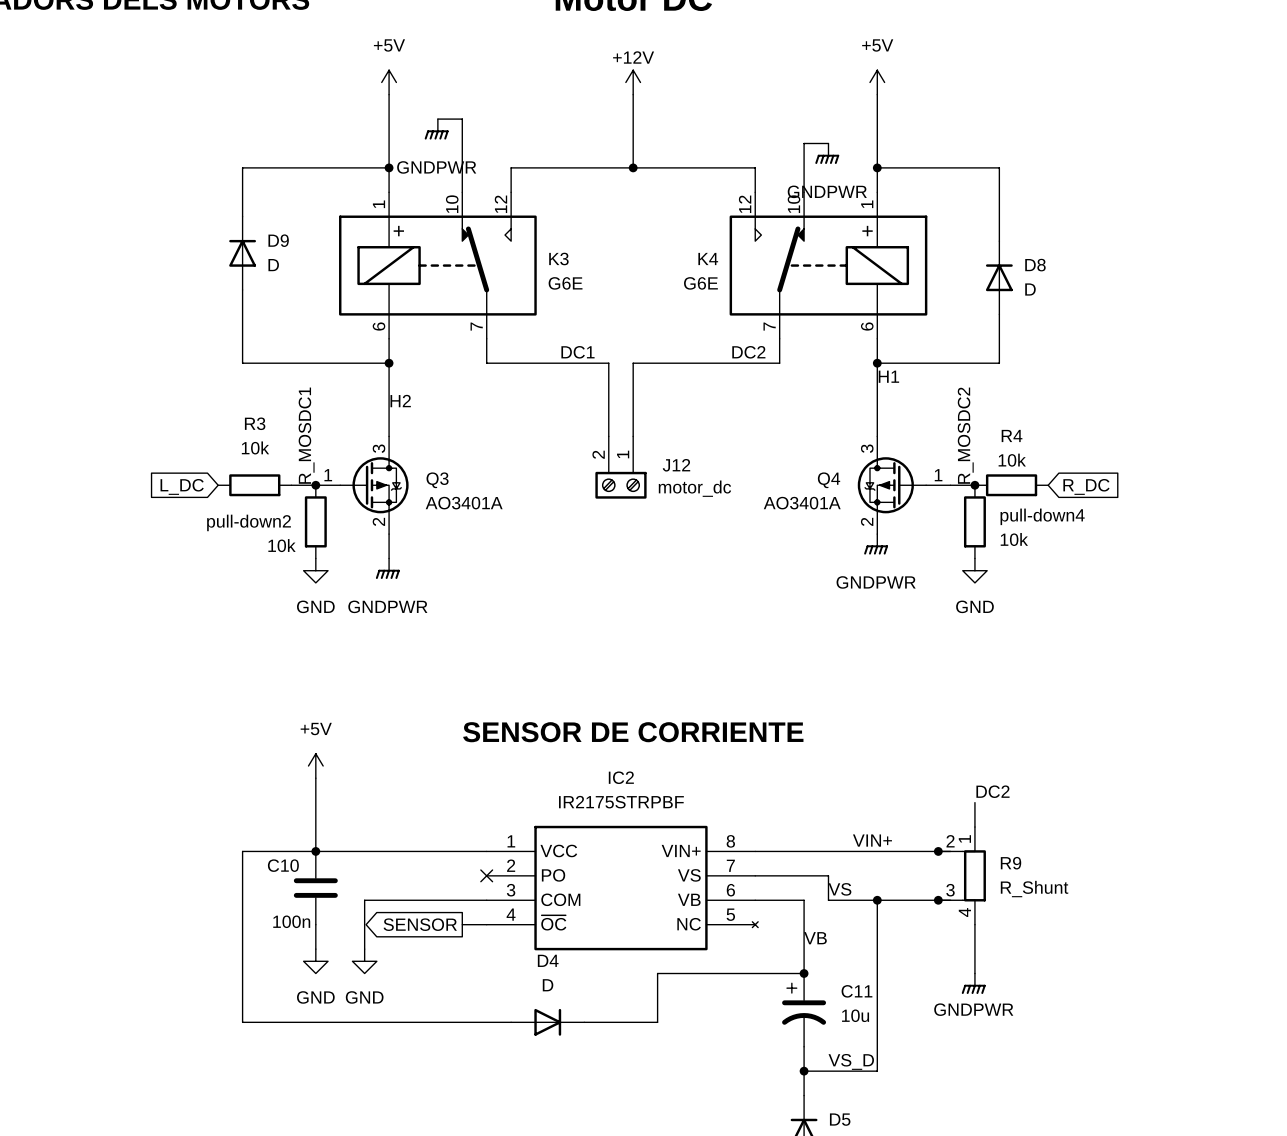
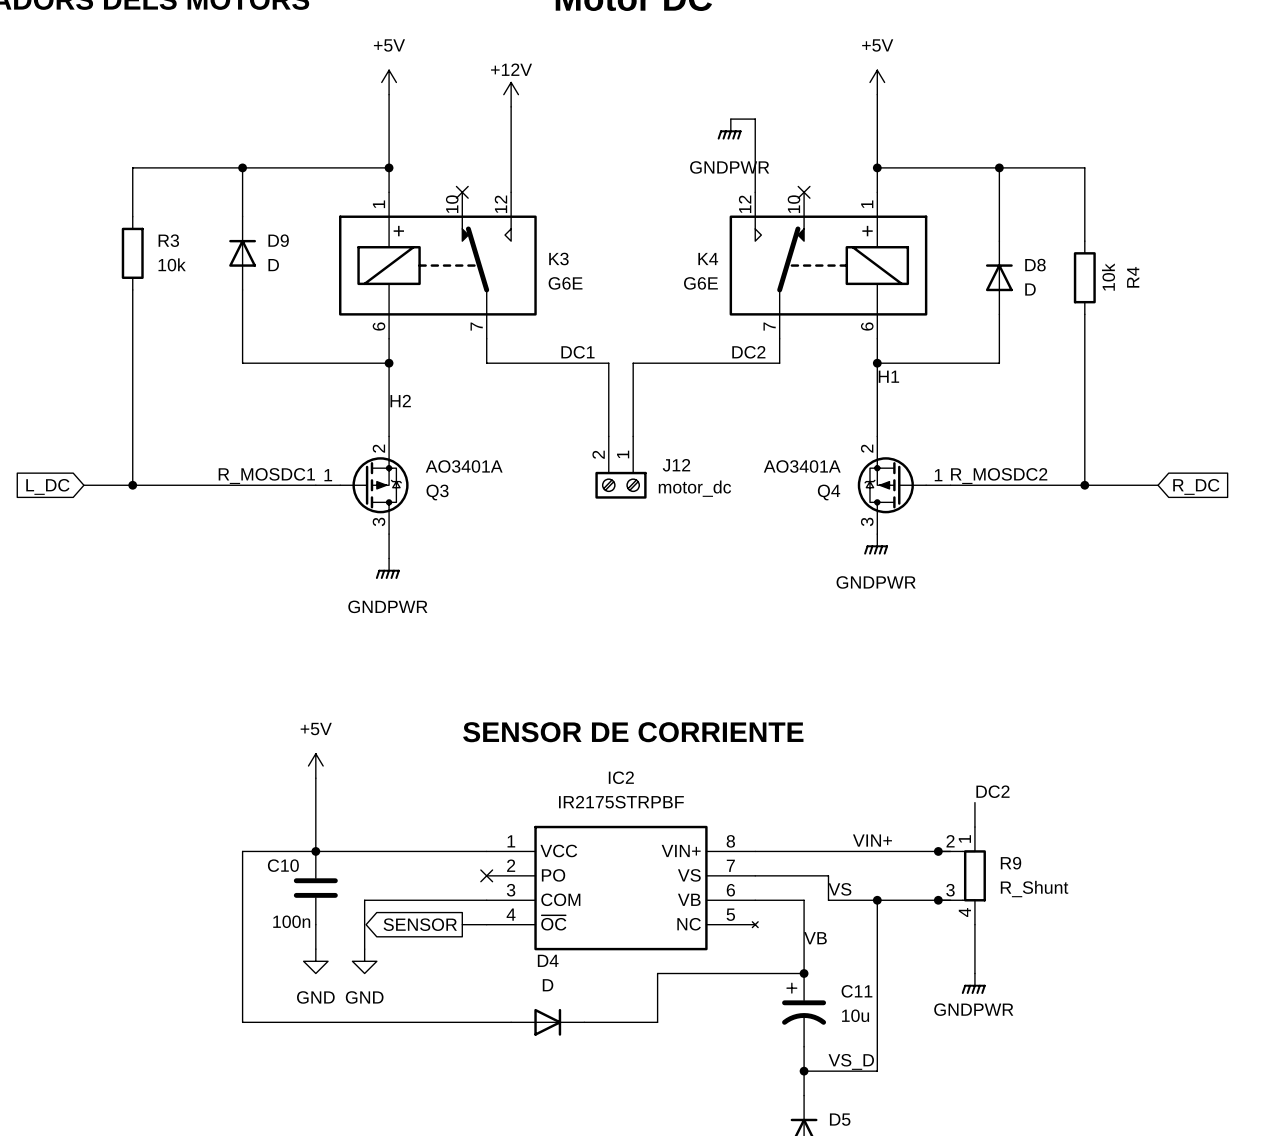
power symbol position: +12V (633, 82) -> +12V (511, 94)
wire: (633, 94) (633, 167) -> none
wire: none -> (511, 106) (511, 167)
wire: (437, 119) (462, 119) (462, 192) -> none
power symbol: GNDPWR (436, 129) -> none
wire: (828, 143) (804, 143) (804, 192) -> none
power symbol position: GNDPWR (827, 153) -> GNDPWR (729, 129)
wire: none -> (242, 167) (132, 167) (132, 216)
junction: none -> (242, 167)
wire: (511, 167) (755, 167) -> (730, 119) (755, 119) (755, 167)
junction: (633, 167) -> none
wire: none -> (999, 167) (1084, 167) (1084, 241)
junction: none -> (999, 167)
no-connect mark: none -> (462, 192)
no-connect mark: none -> (804, 192)
wire: none -> (132, 289) (132, 485)
wire: none -> (1084, 314) (1084, 485)
R3 name position: R3 (255, 423) -> R3 (168, 240)
label rotation: 0° (306, 435) -> 90° clockwise (266, 476)
label rotation: 0° (965, 435) -> 90° clockwise (999, 476)
wire: none -> (83, 485) (291, 485)
junction: none -> (132, 485)
R3 rotation: 0° (254, 485) -> 90° clockwise (132, 253)
R3 position: (254, 485) -> (132, 253)
junction: (315, 485) -> none
Q3 flip: as is (374, 485) -> up-down (374, 485)
Q4 flip: as is (891, 485) -> up-down (891, 485)
wire: none -> (974, 485) (1158, 485)
junction: (974, 485) -> none
R4 rotation: 0° (1011, 485) -> 90° clockwise (1084, 277)
R4 position: (1011, 485) -> (1084, 277)
junction: none -> (1084, 485)
global label position: L_DC (182, 486) -> L_DC (47, 486)
global label position: R_DC (1086, 486) -> R_DC (1196, 486)
pull-down2: 10k (315, 521) -> none
pull-down4: 10k (974, 521) -> none
power symbol: GND (315, 570) -> none
power symbol: GND (974, 570) -> none

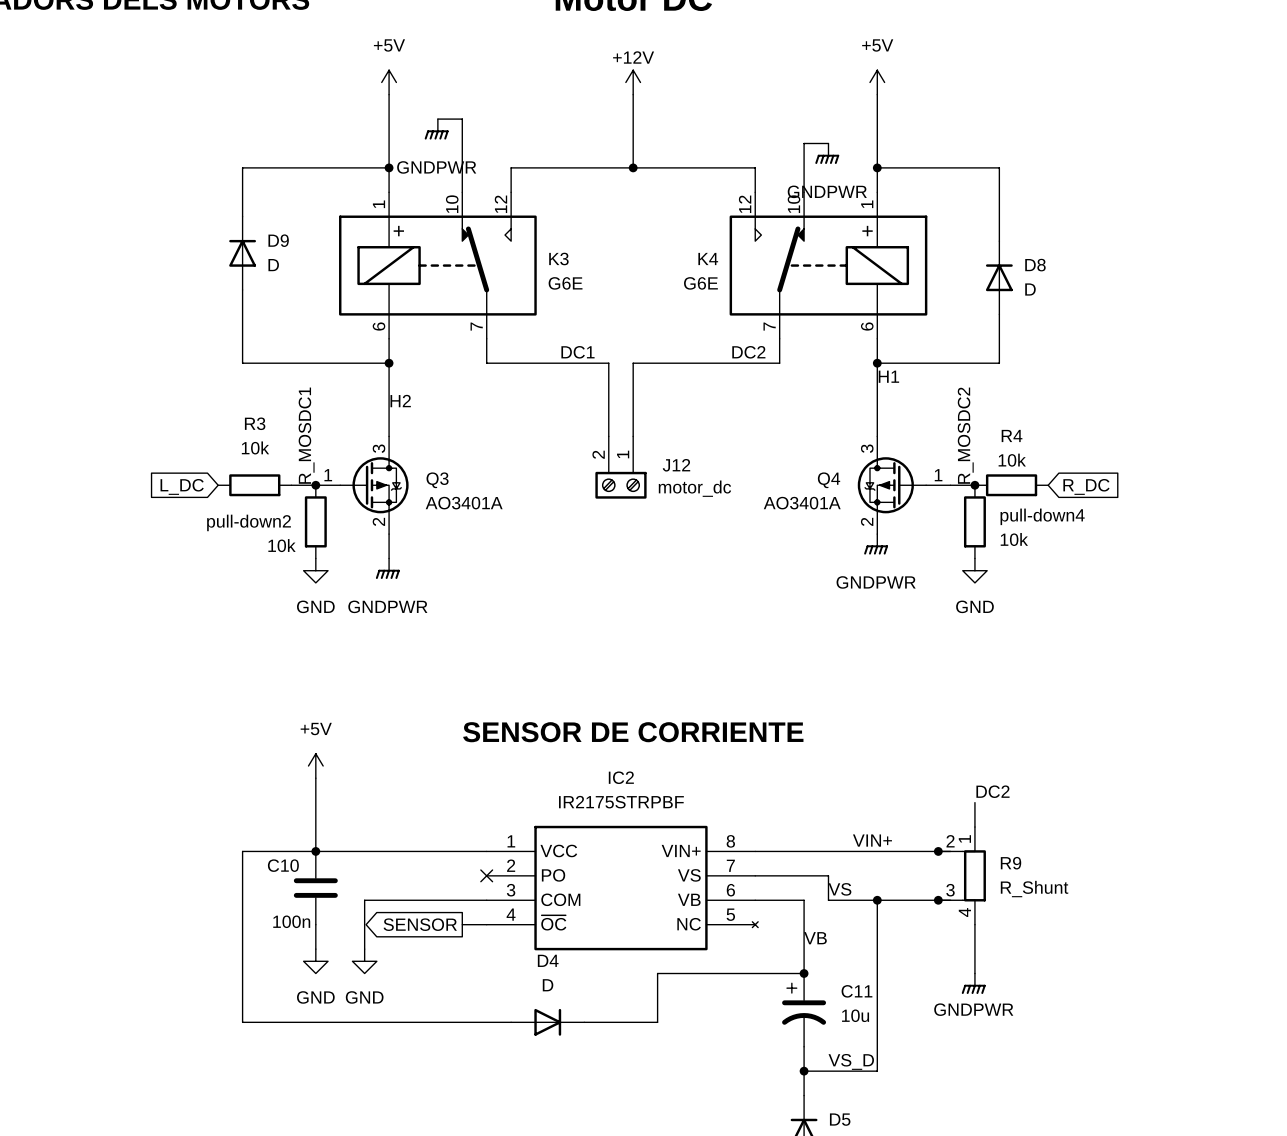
power symbol position: +12V (511, 94) -> +12V (633, 82)
wire: none -> (633, 94) (633, 167)
wire: (511, 106) (511, 167) -> none
wire: none -> (437, 119) (462, 119) (462, 192)
wire: (730, 119) (755, 119) (755, 167) -> (511, 167) (755, 167)
power symbol: none -> GNDPWR (436, 129)
power symbol position: GNDPWR (729, 129) -> GNDPWR (827, 153)
wire: none -> (828, 143) (804, 143) (804, 192)
wire: (242, 167) (132, 167) (132, 216) -> none
junction: (242, 167) -> none
junction: none -> (633, 167)
wire: (999, 167) (1084, 167) (1084, 241) -> none
junction: (999, 167) -> none
no-connect mark: (462, 192) -> none
no-connect mark: (804, 192) -> none
R3 name position: R3 (168, 240) -> R3 (255, 423)
R3 rotation: 0° (132, 253) -> 90° clockwise (254, 485)
R3 position: (132, 253) -> (254, 485)
R3 value position: 10k (172, 264) -> 10k (255, 447)
R4 rotation: 0° (1084, 277) -> 90° clockwise (1011, 485)
R4 position: (1084, 277) -> (1011, 485)
R4 value position: 10k (1108, 277) -> 10k (1012, 460)
R4 name position: R4 (1133, 277) -> R4 (1012, 435)
wire: (132, 289) (132, 485) -> none
wire: (1084, 314) (1084, 485) -> none
label rotation: 0° (266, 476) -> 90° counterclockwise (306, 435)
label rotation: 0° (999, 476) -> 90° counterclockwise (965, 435)
wire: (83, 485) (291, 485) -> none
junction: (132, 485) -> none
junction: none -> (315, 485)
Q3 flip: as is (374, 485) -> up-down (374, 485)
Q4 flip: as is (891, 485) -> up-down (891, 485)
wire: (974, 485) (1158, 485) -> none
junction: none -> (974, 485)
junction: (1084, 485) -> none
global label position: L_DC (47, 486) -> L_DC (182, 486)
global label position: R_DC (1196, 486) -> R_DC (1086, 486)
pull-down2: none -> 10k (315, 521)
pull-down4: none -> 10k (974, 521)
power symbol: none -> GND (315, 570)
power symbol: none -> GND (974, 570)

